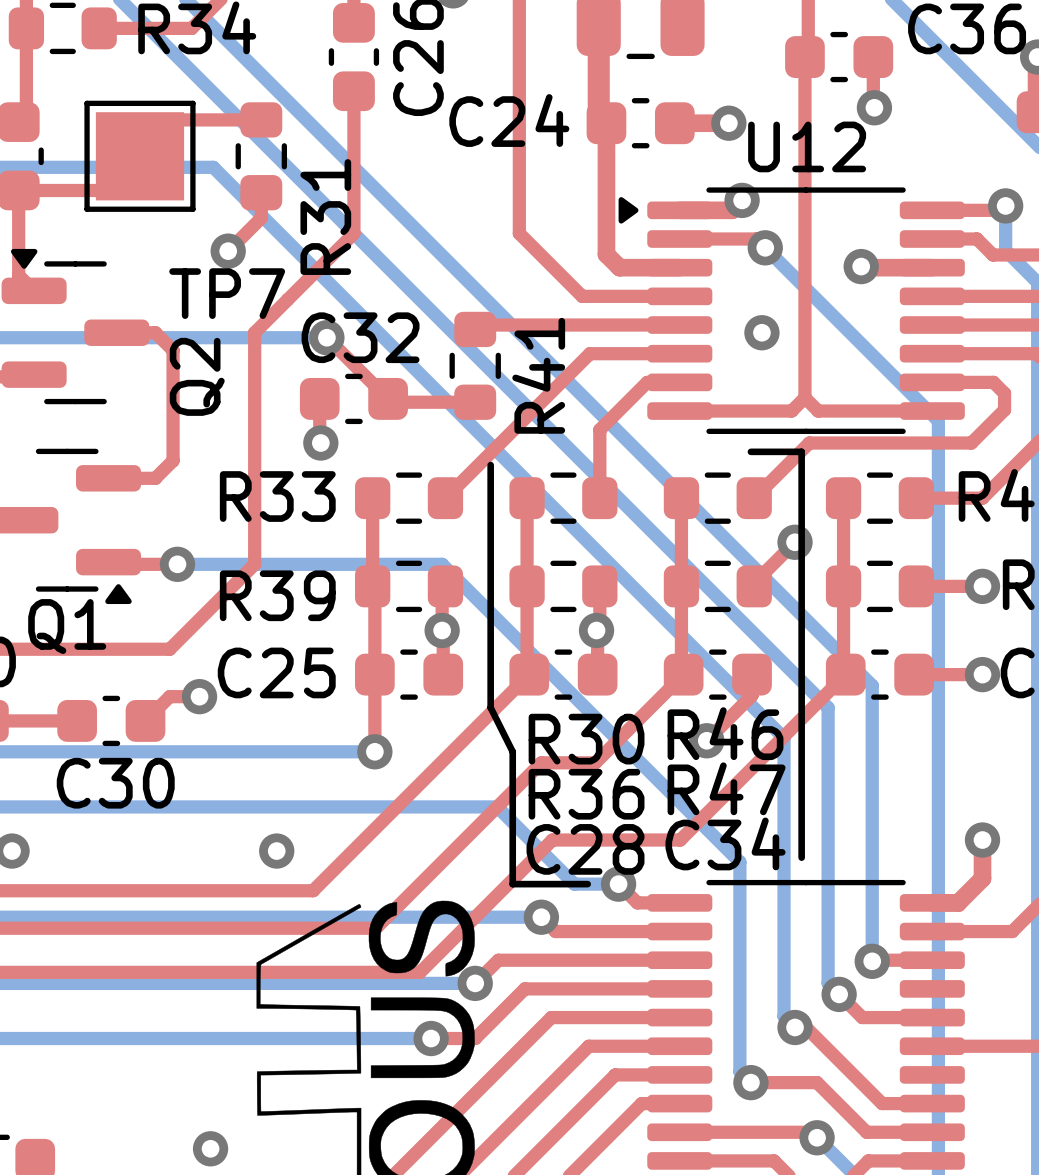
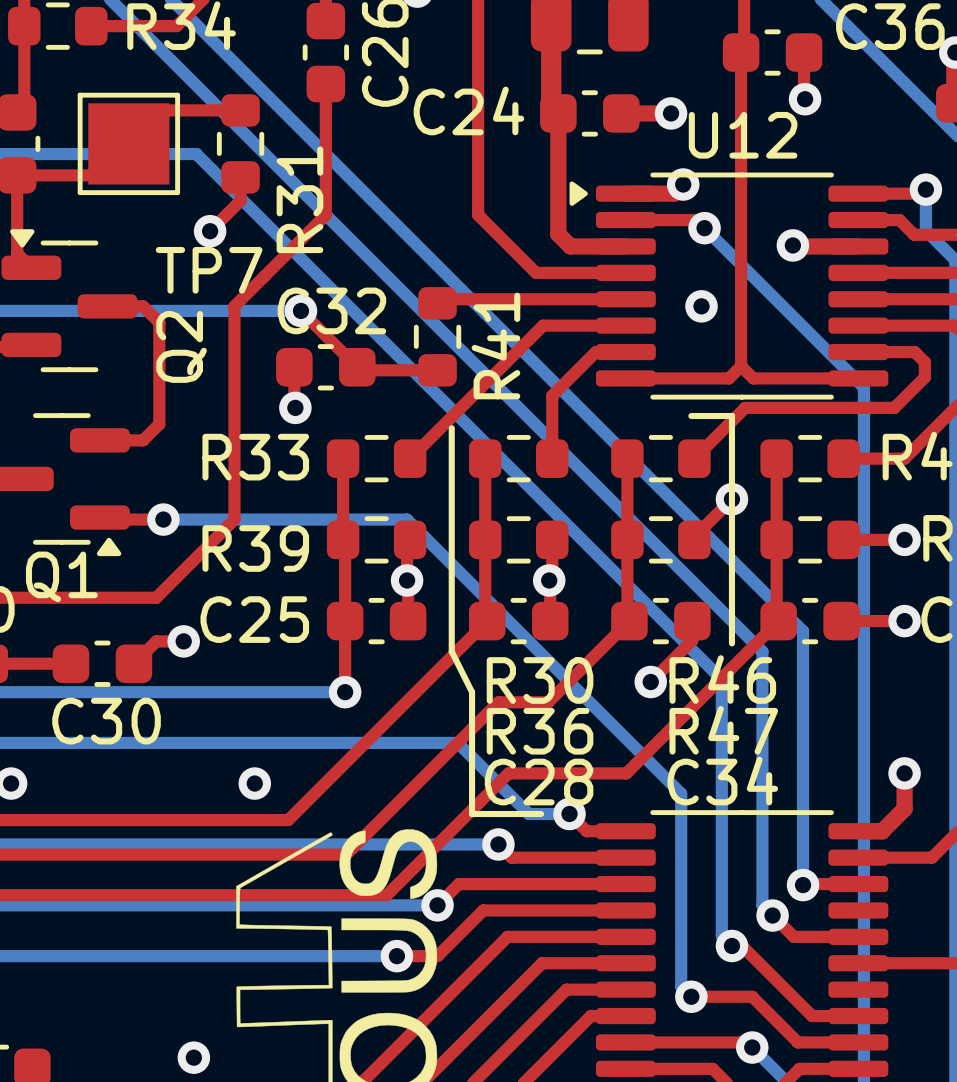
line: (795, 451) (801, 451) (801, 857) -> (731, 416) (731, 643)
R46 name position: R46 (725, 733) -> R46 (722, 679)
R47 name position: R47 (726, 788) -> R47 (723, 730)
C34 name position: C34 (725, 843) -> C34 (722, 781)

